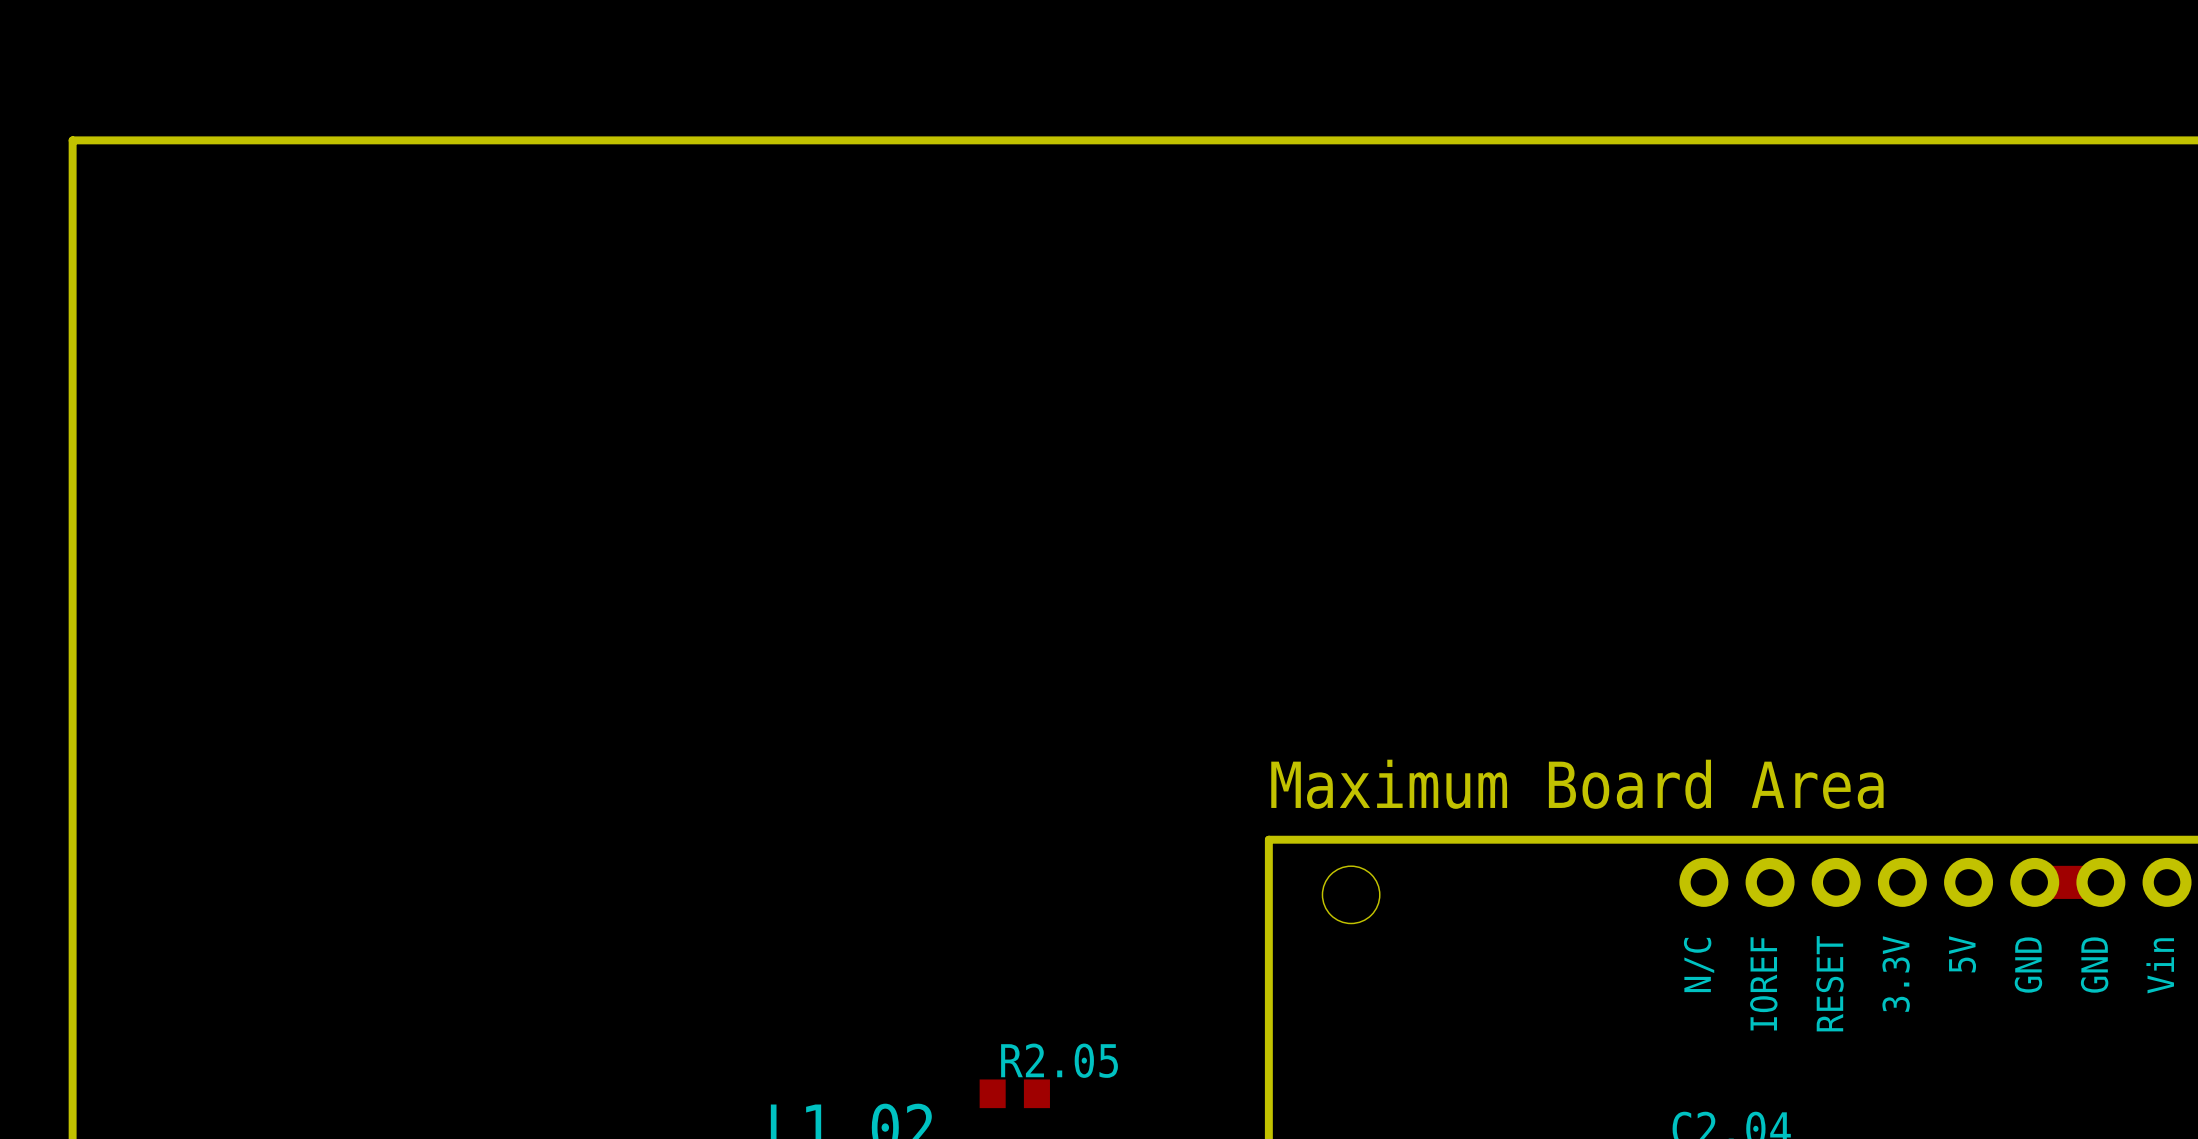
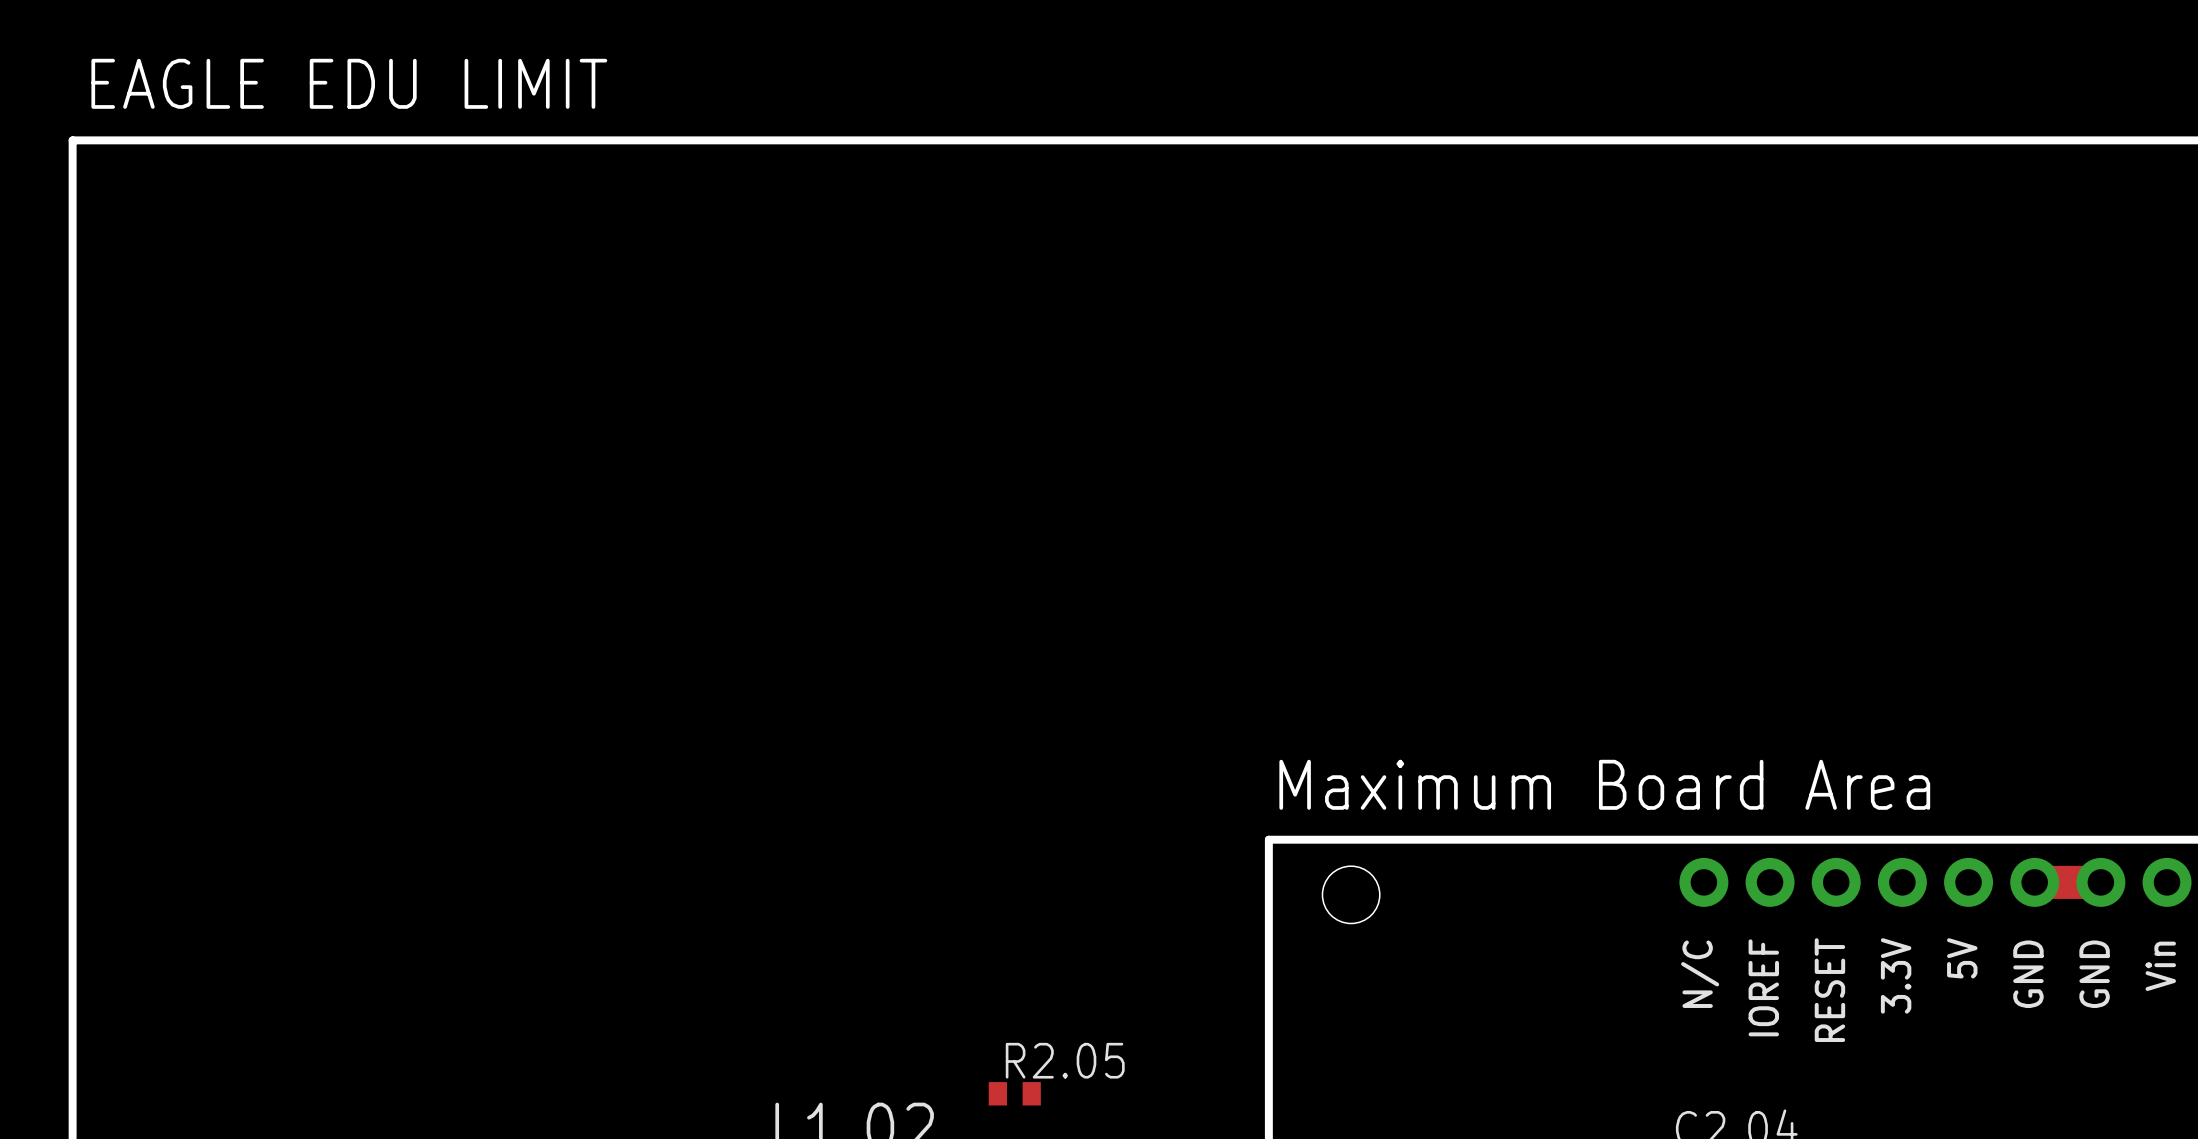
text: none -> EAGLE EDU LIMIT (349, 83)
R2.05 footprint: [979, 1079, 1050, 1109] -> [988, 1082, 1041, 1106]

